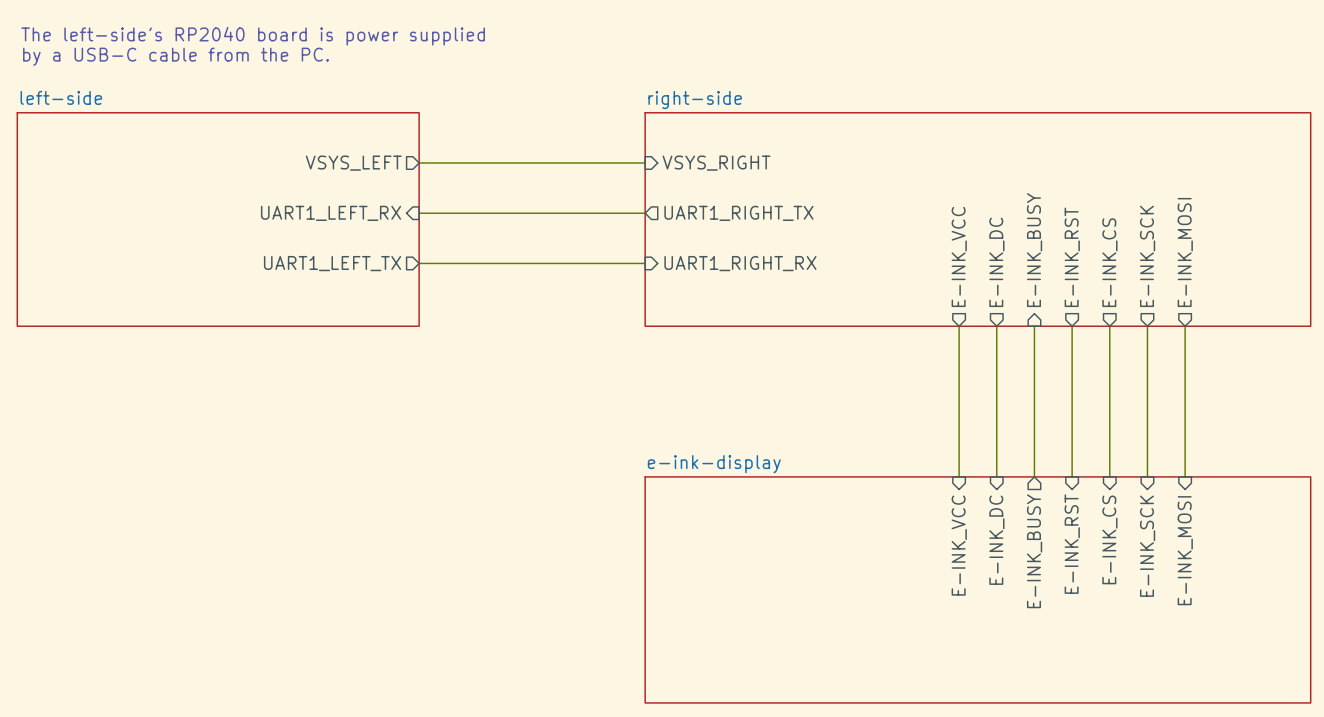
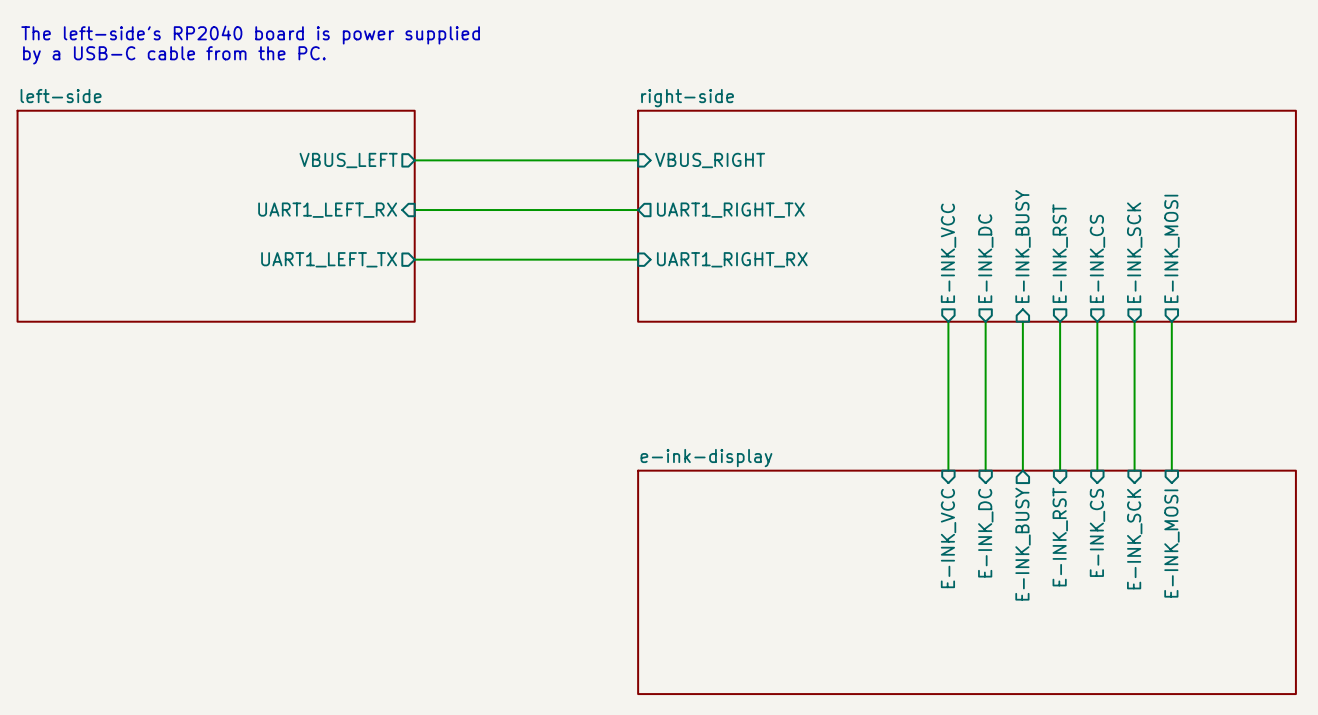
sheet pin: VSYS_LEFT (353, 163) -> VBUS_LEFT (348, 160)
sheet pin: VSYS_RIGHT (716, 163) -> VBUS_RIGHT (710, 160)

